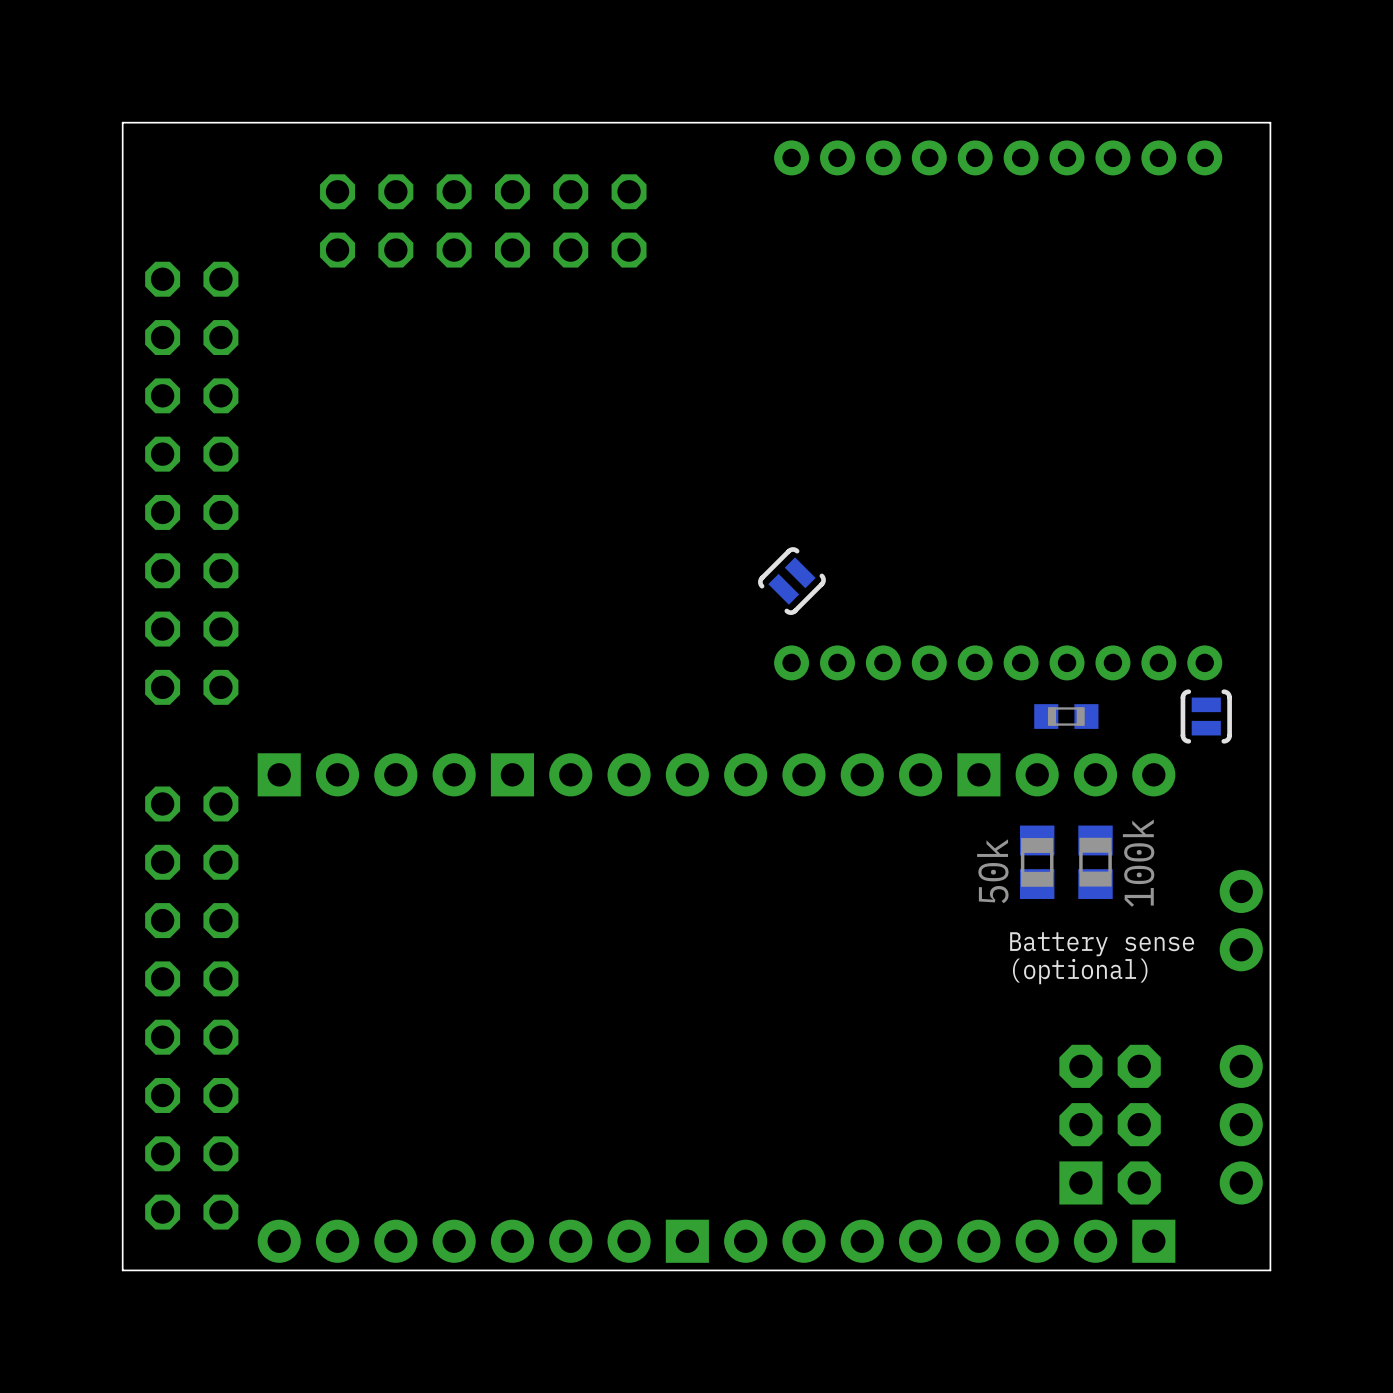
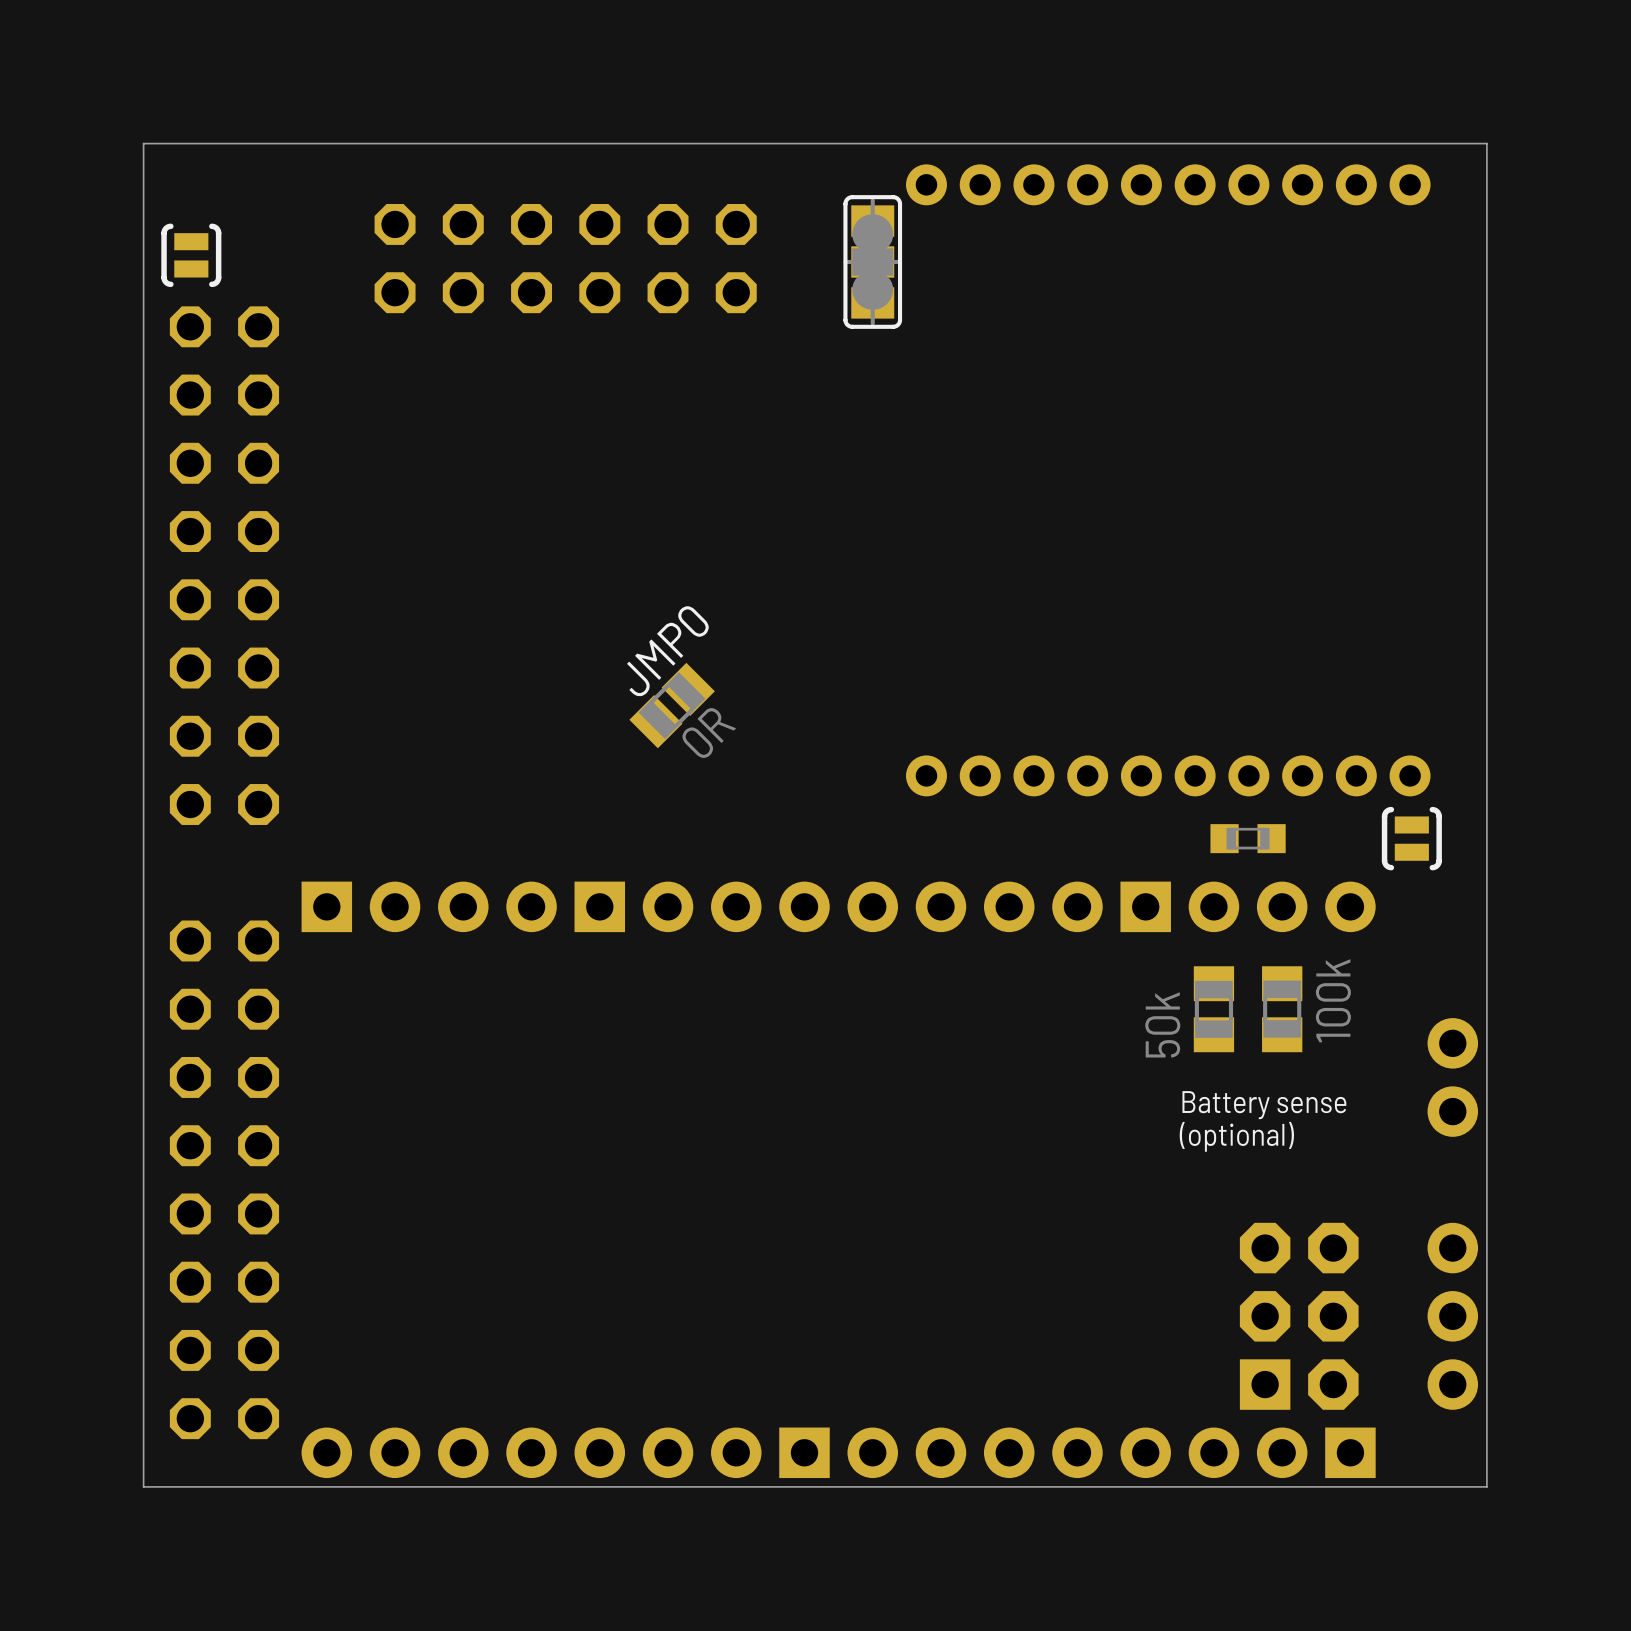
part: none -> (191, 255)
part: none -> (872, 261)
part: (791, 581) -> none
JMP0: none -> 0R (672, 705)

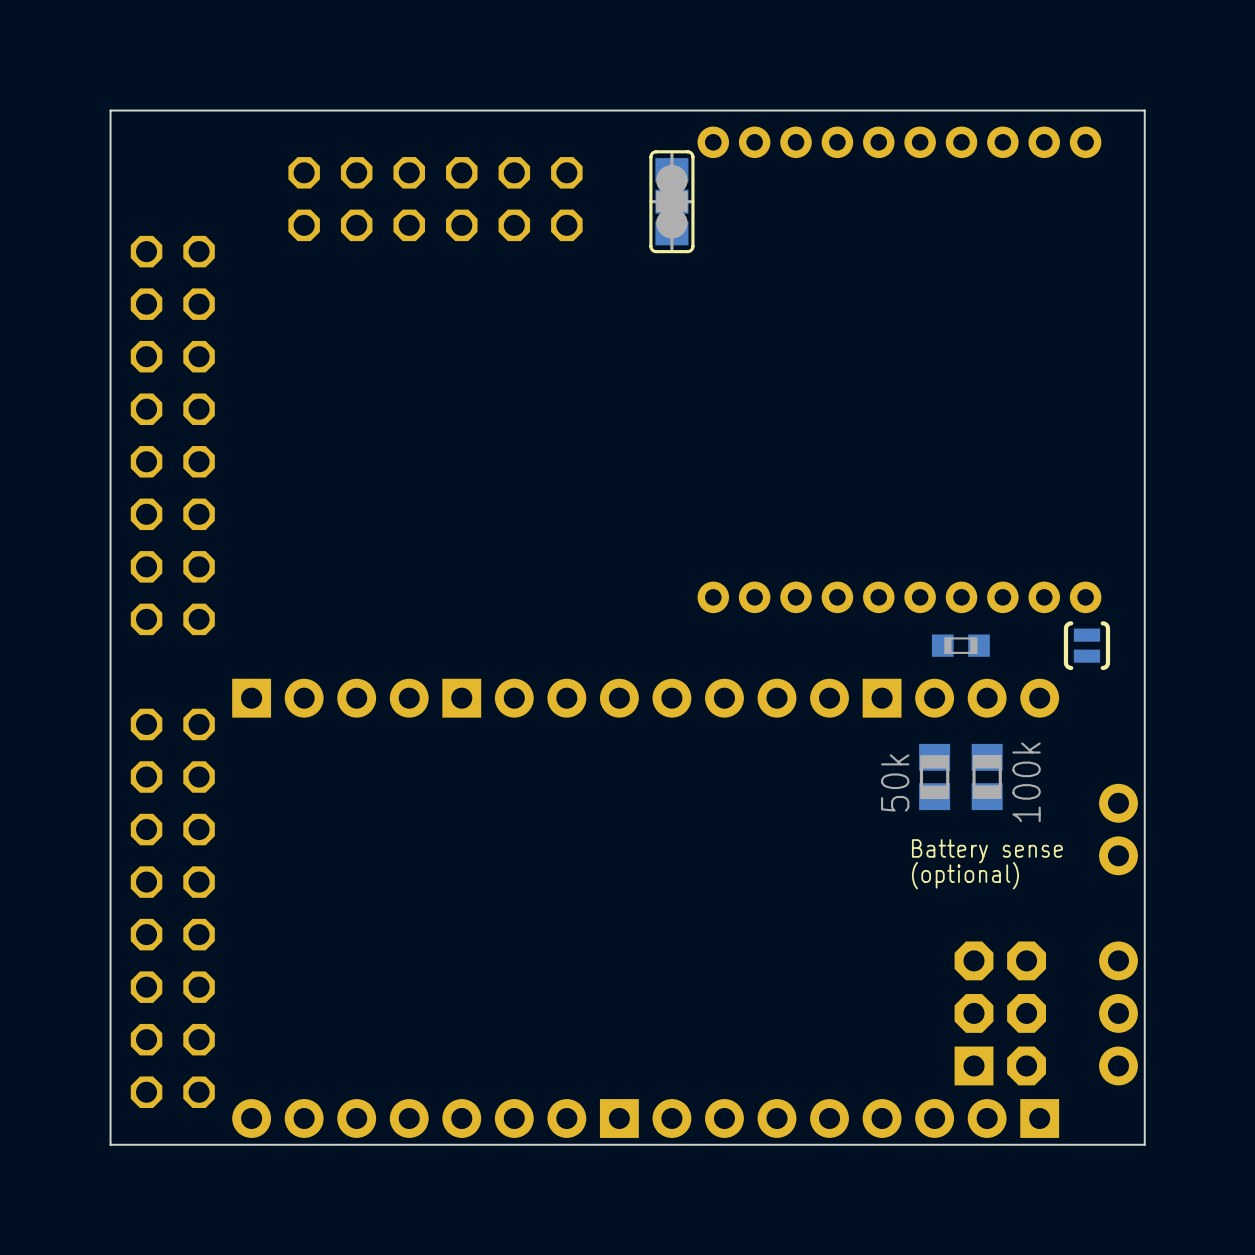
part: (191, 255) -> none
JMP0: 0R (672, 705) -> none

